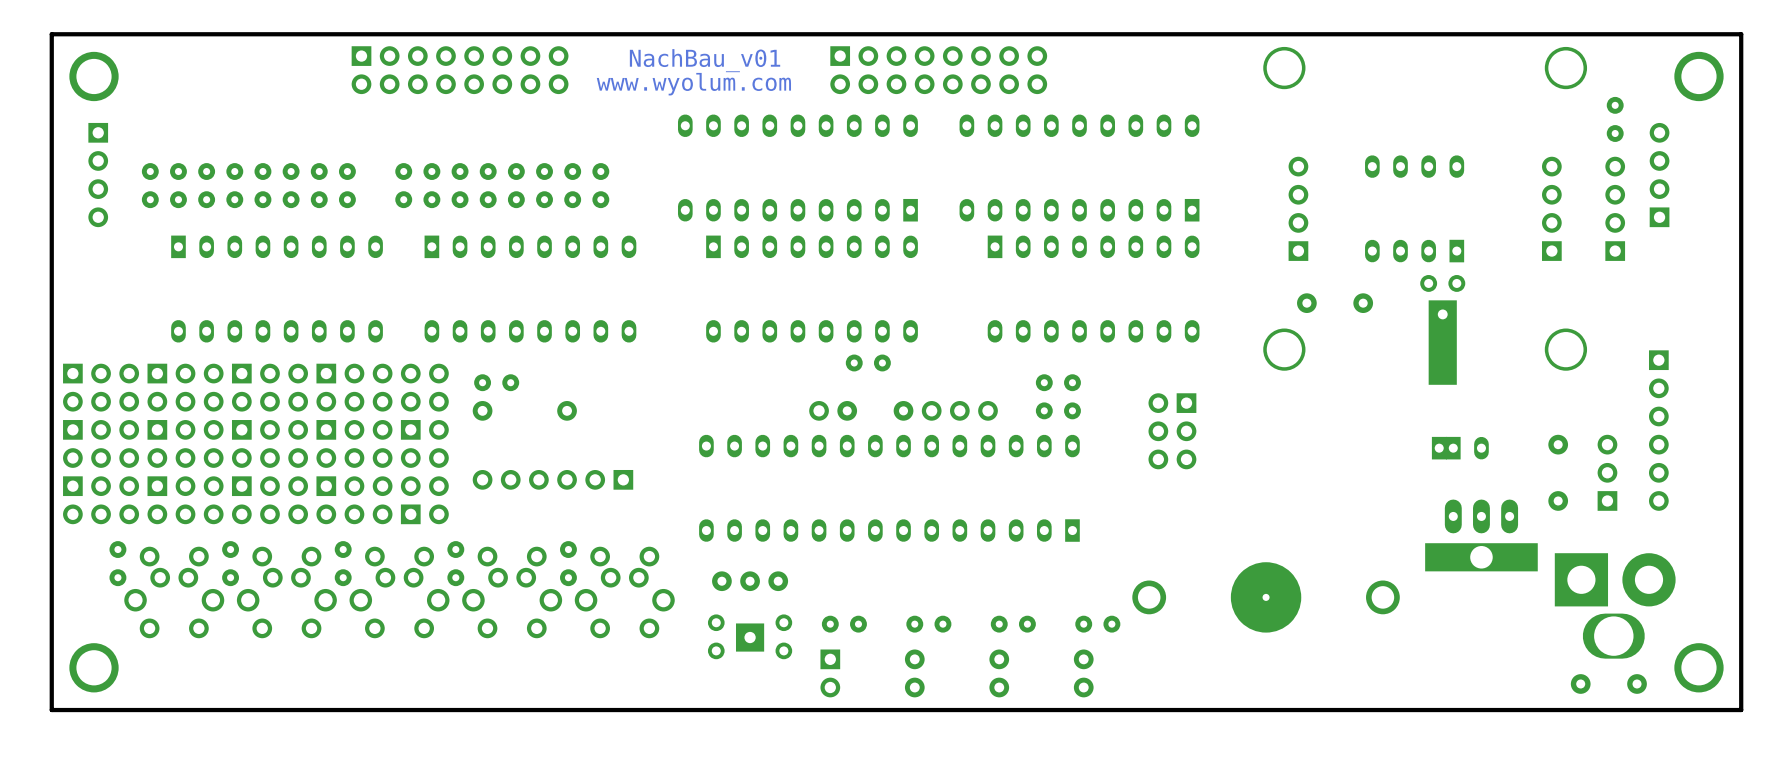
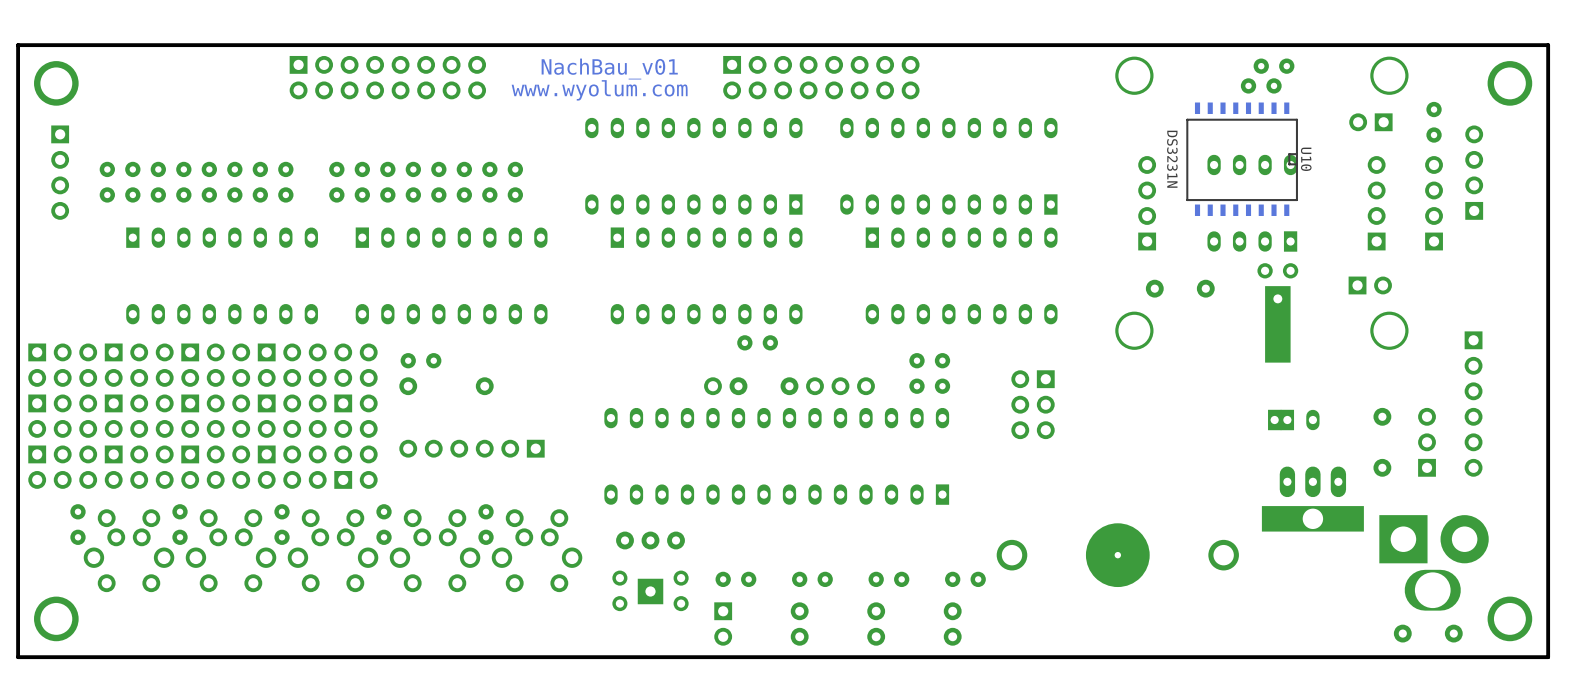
part: none -> (1274, 66)
part: none -> (1261, 85)
part: none -> (1370, 122)
U10: none -> DS3231N (1242, 159)
part: none -> (1370, 285)

